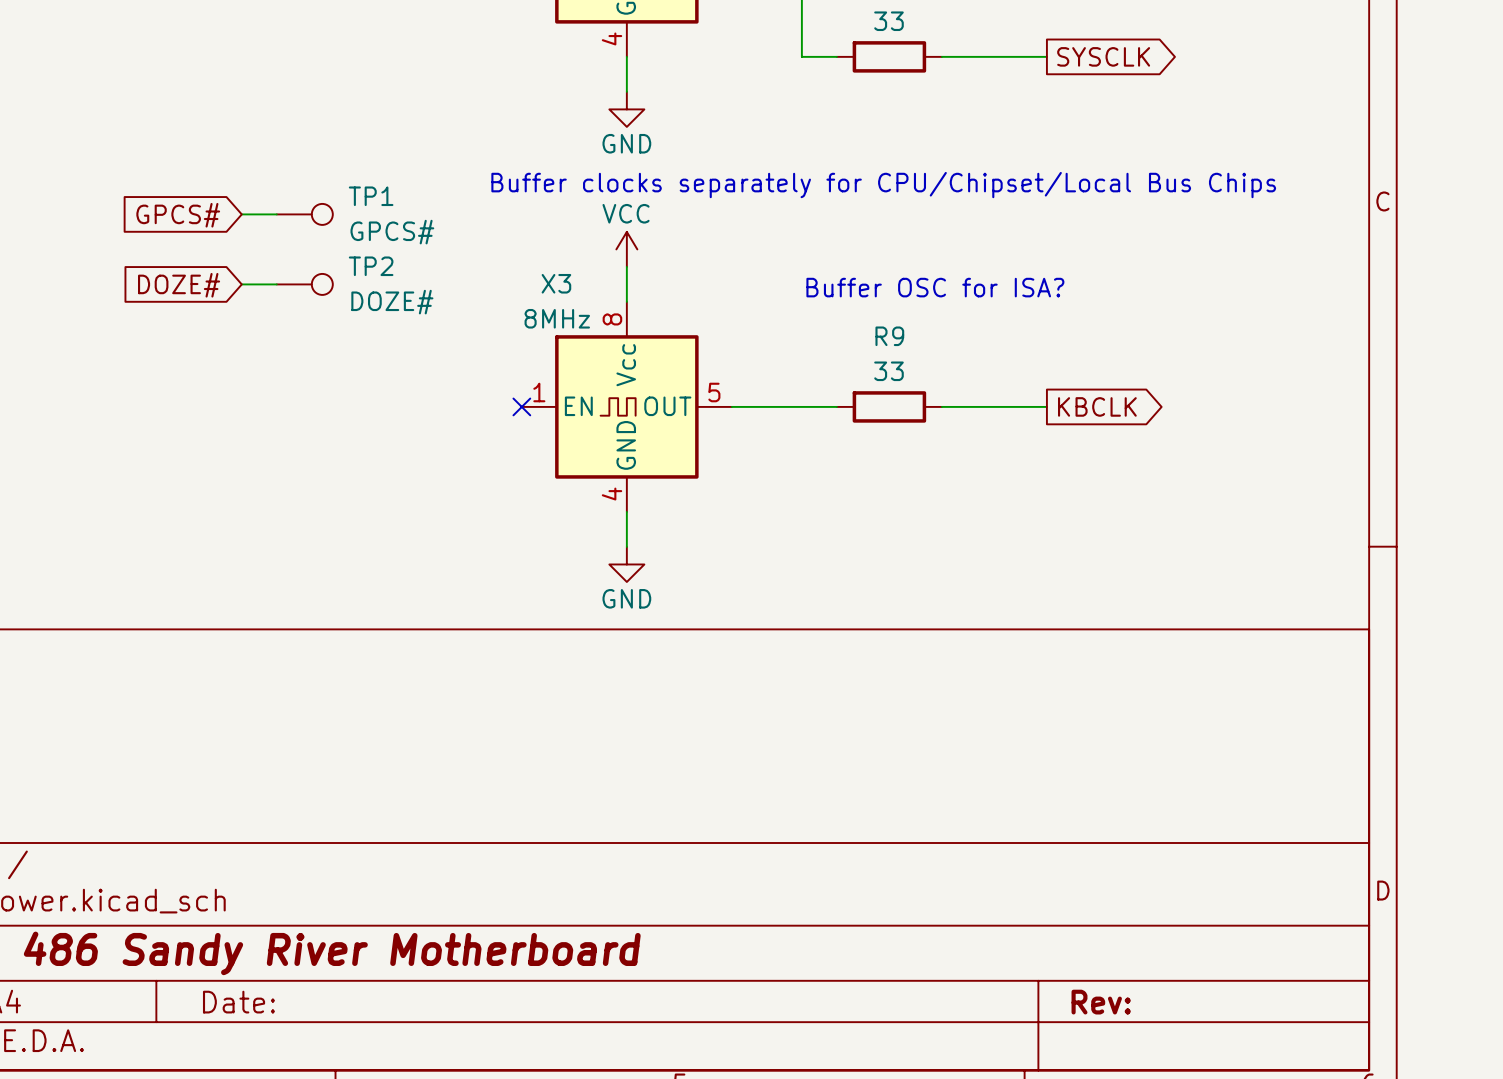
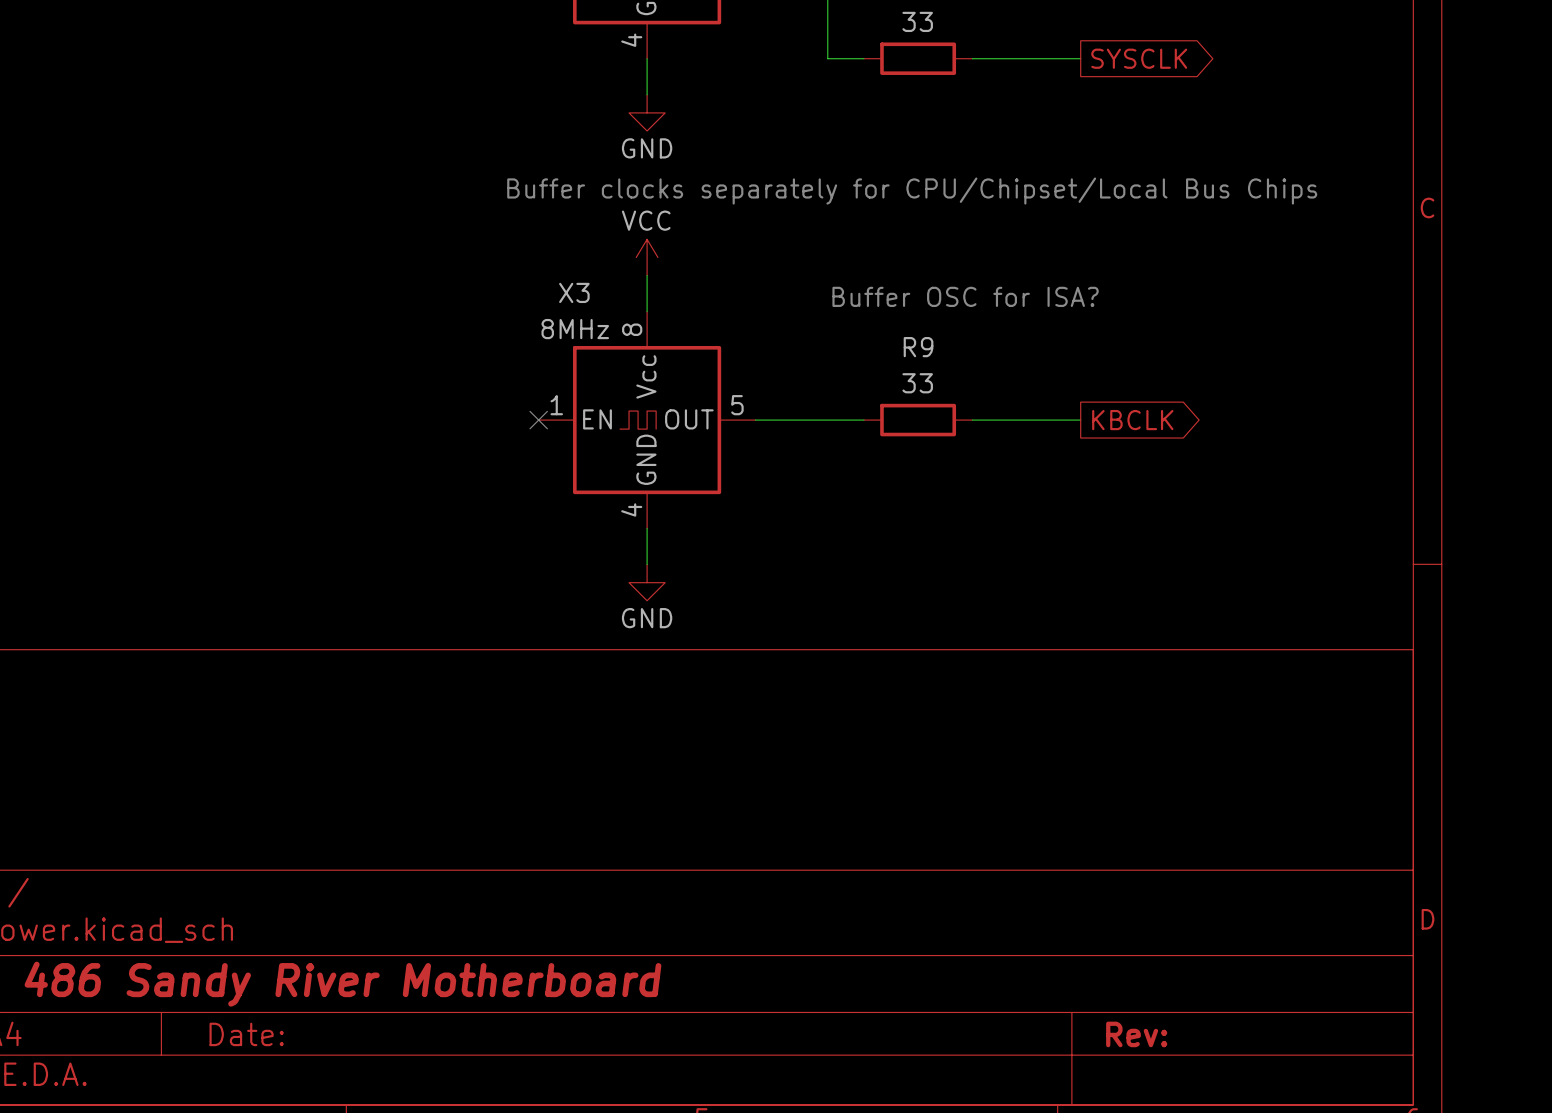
wire: (241, 214) (276, 214) -> none
TP1: GPCS# (304, 214) -> none
global label: GPCS# (178, 215) -> none
wire: (241, 284) (276, 284) -> none
TP2: DOZE# (304, 284) -> none
global label: DOZE# (179, 285) -> none

